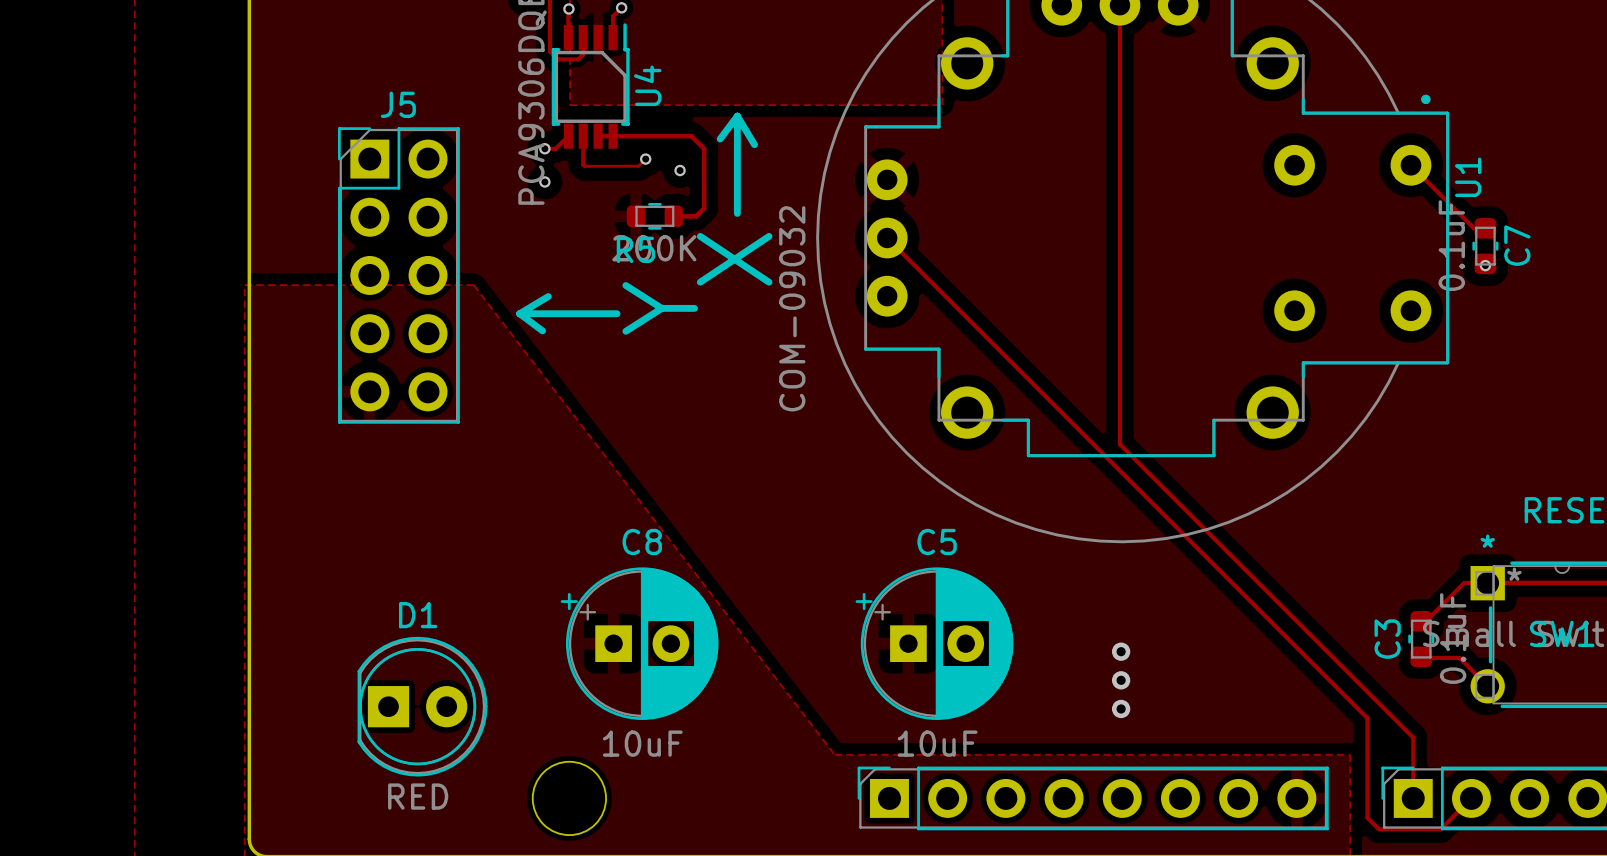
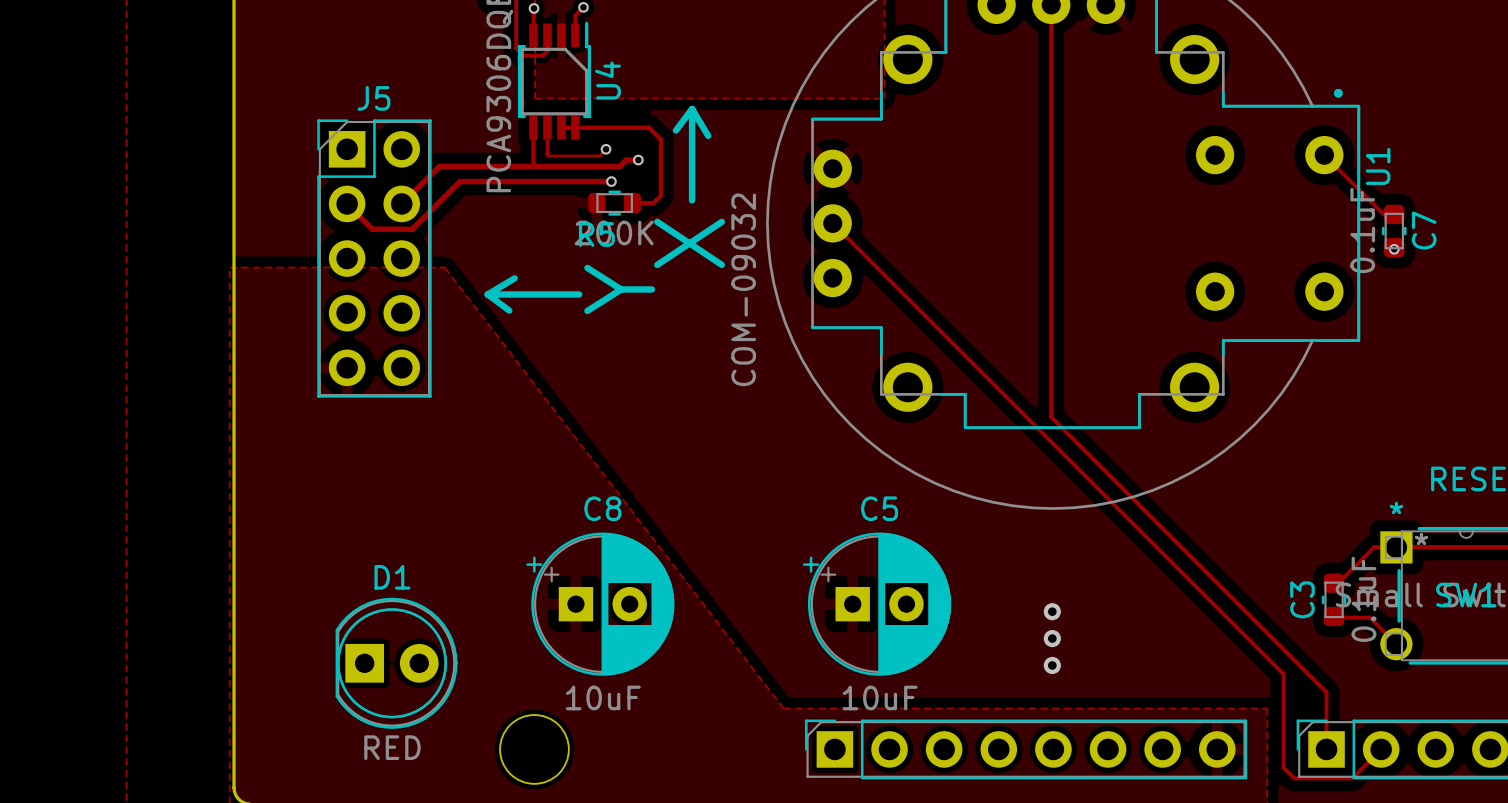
track: (568, 136) (555, 148) (544, 148) -> (533, 127) (533, 164) (535, 166)
via: (544, 148) -> none
track: none -> (638, 160) (626, 160) (620, 166) (439, 166) (401, 203)
via: (544, 181) -> none
track: none -> (611, 181) (459, 181) (412, 229) (372, 229) (347, 203)
via: none -> (611, 181)

